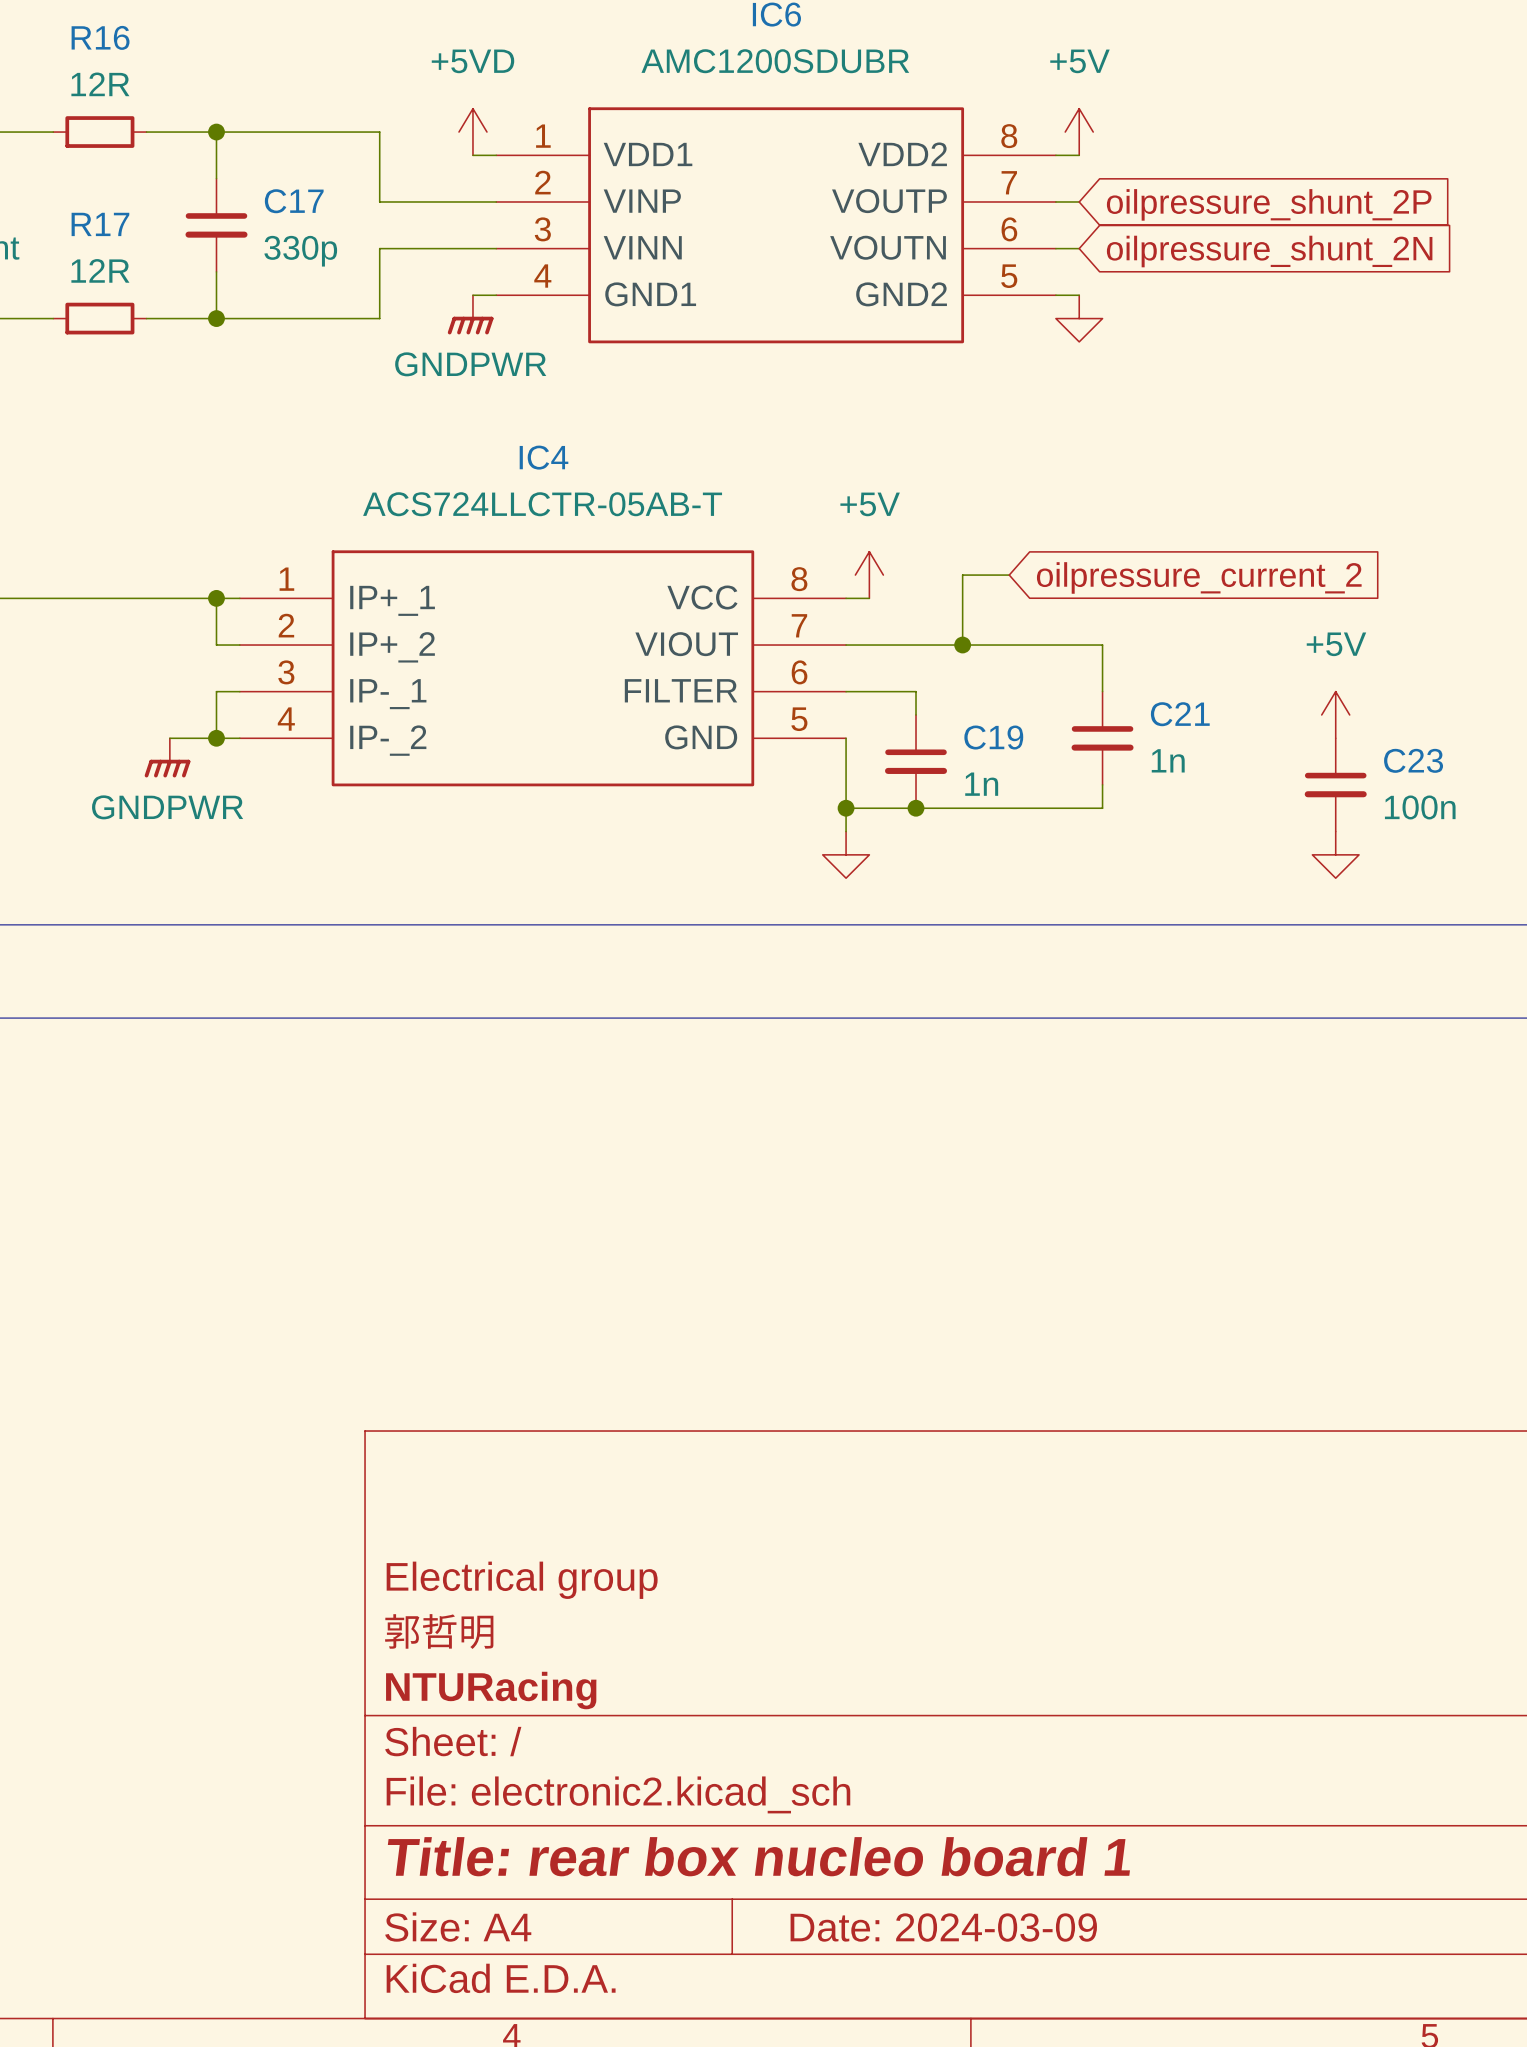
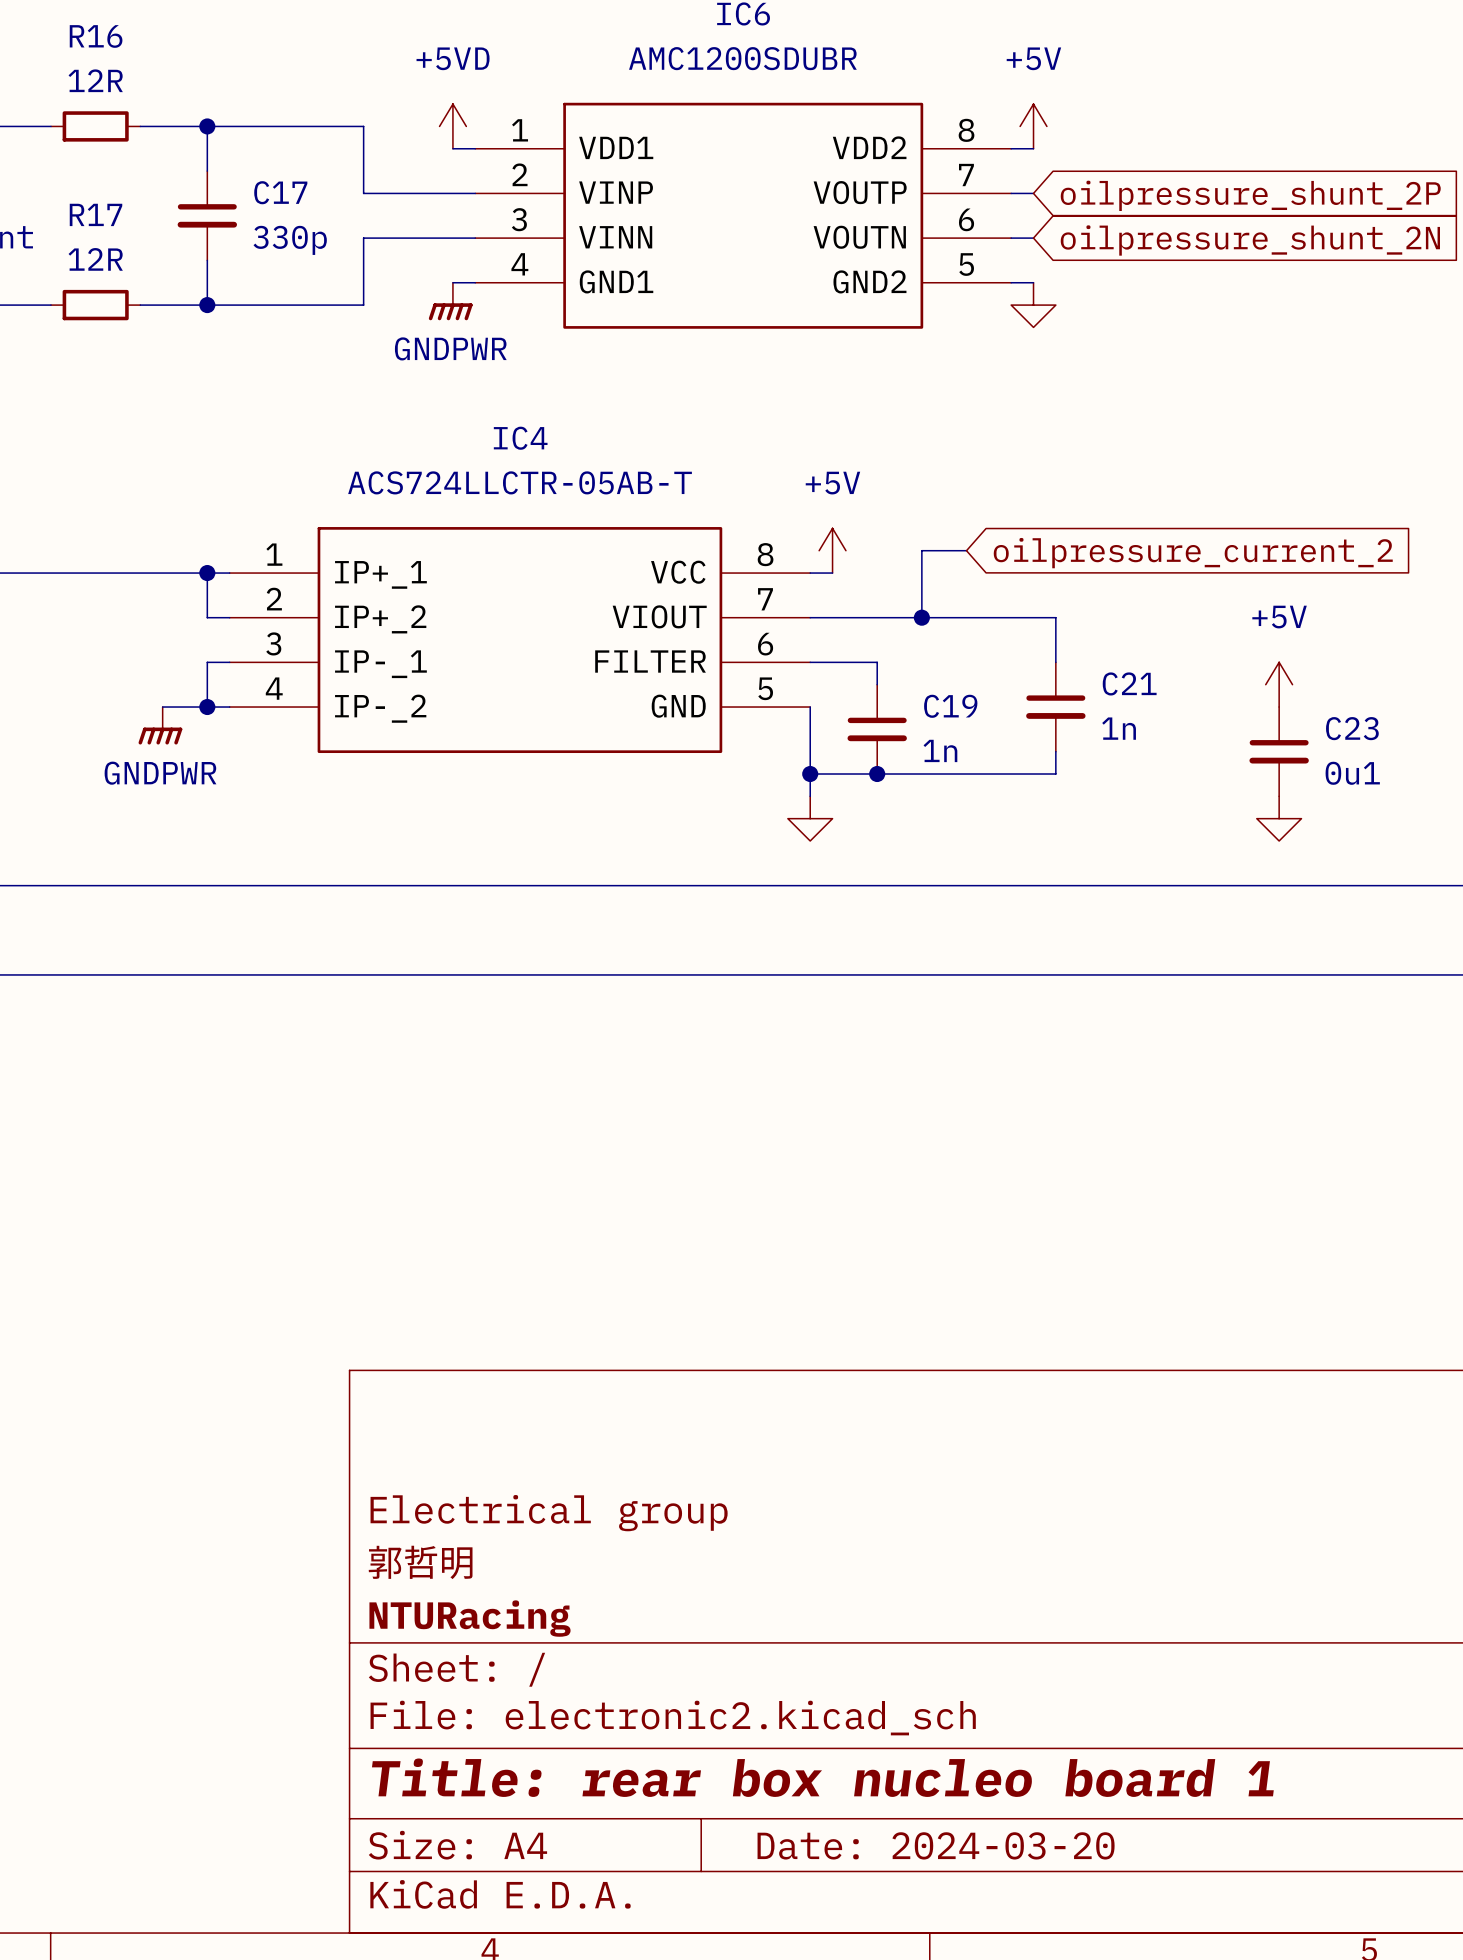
C23 value: 100n (1420, 807) -> 0u1 (1352, 773)
title block: Date: 2024-03-09 (943, 1927) -> Date: 2024-03-20 (936, 1845)

